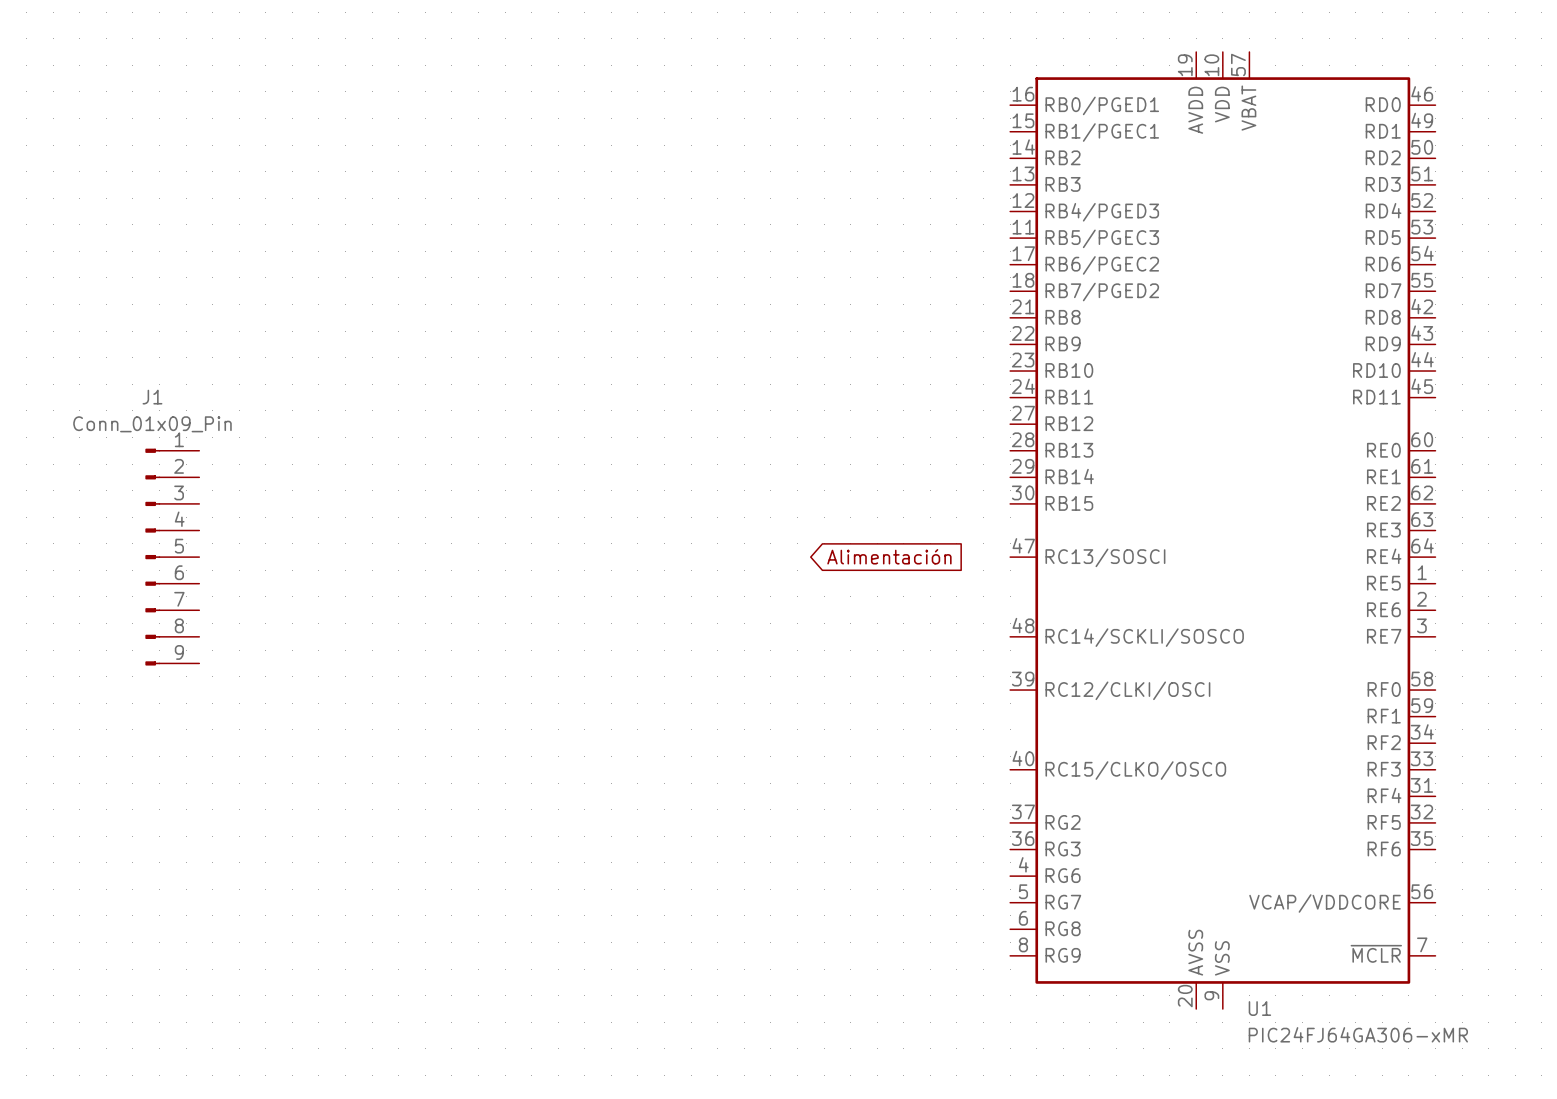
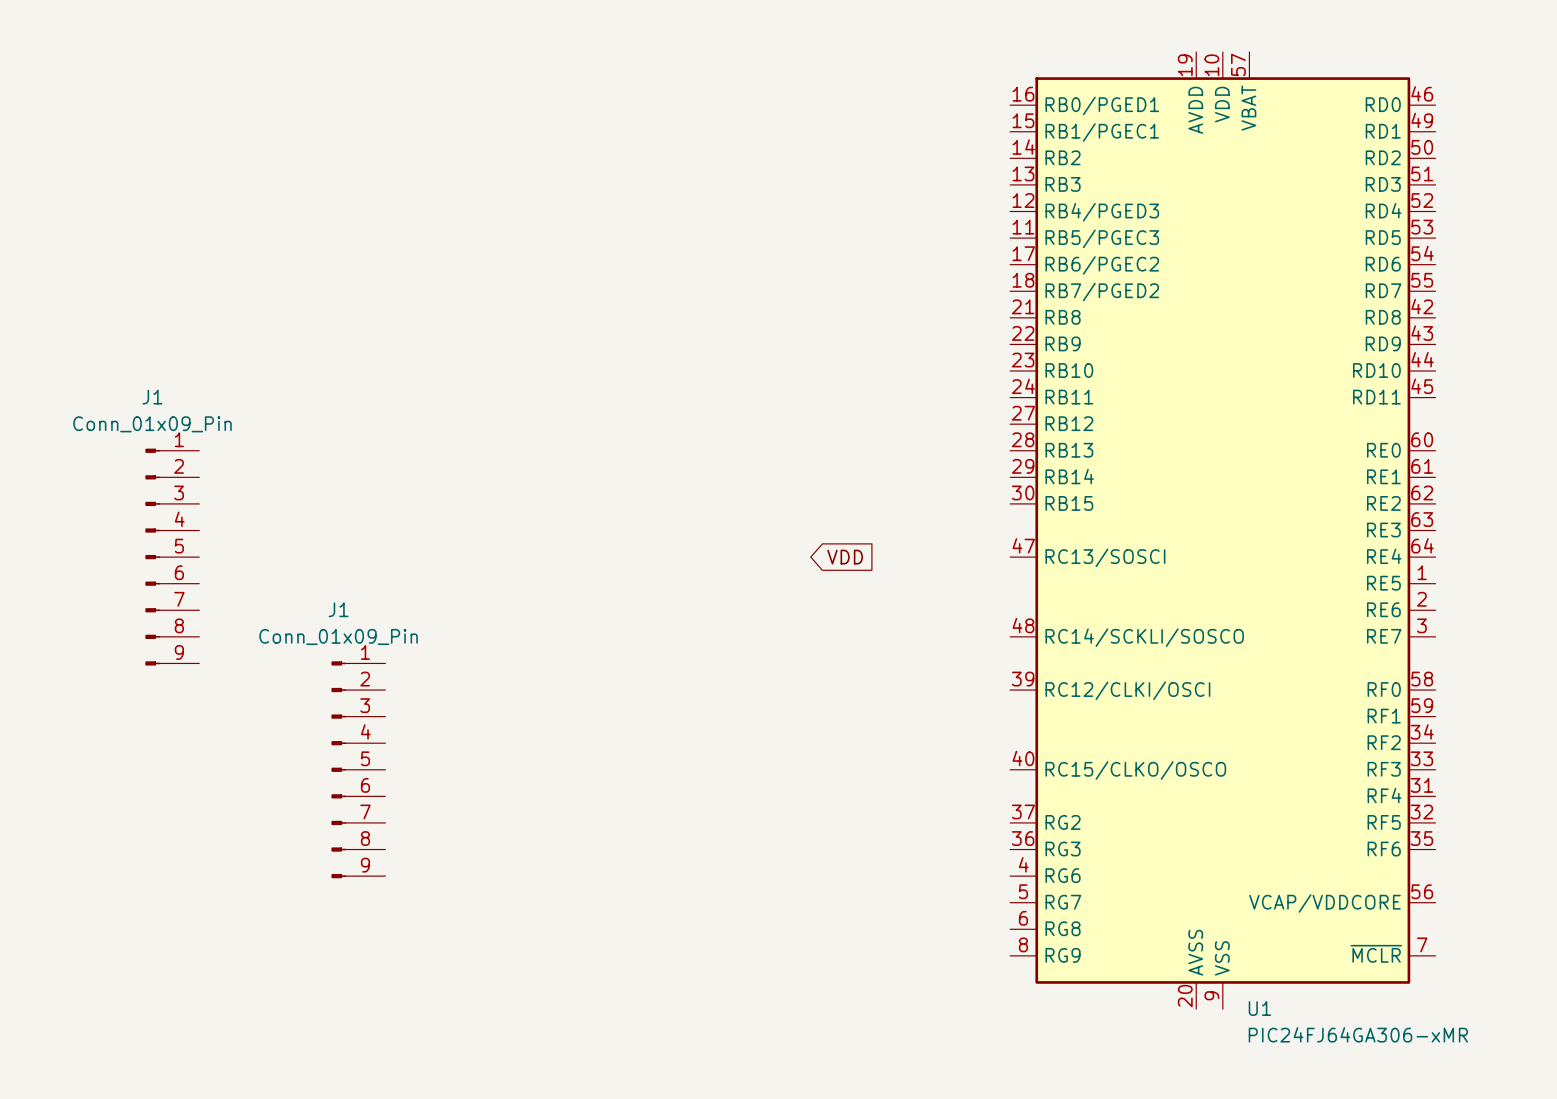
global label: Alimentación (889, 556) -> VDD (845, 557)
J1: none -> Conn_01x09_Pin (358, 769)

